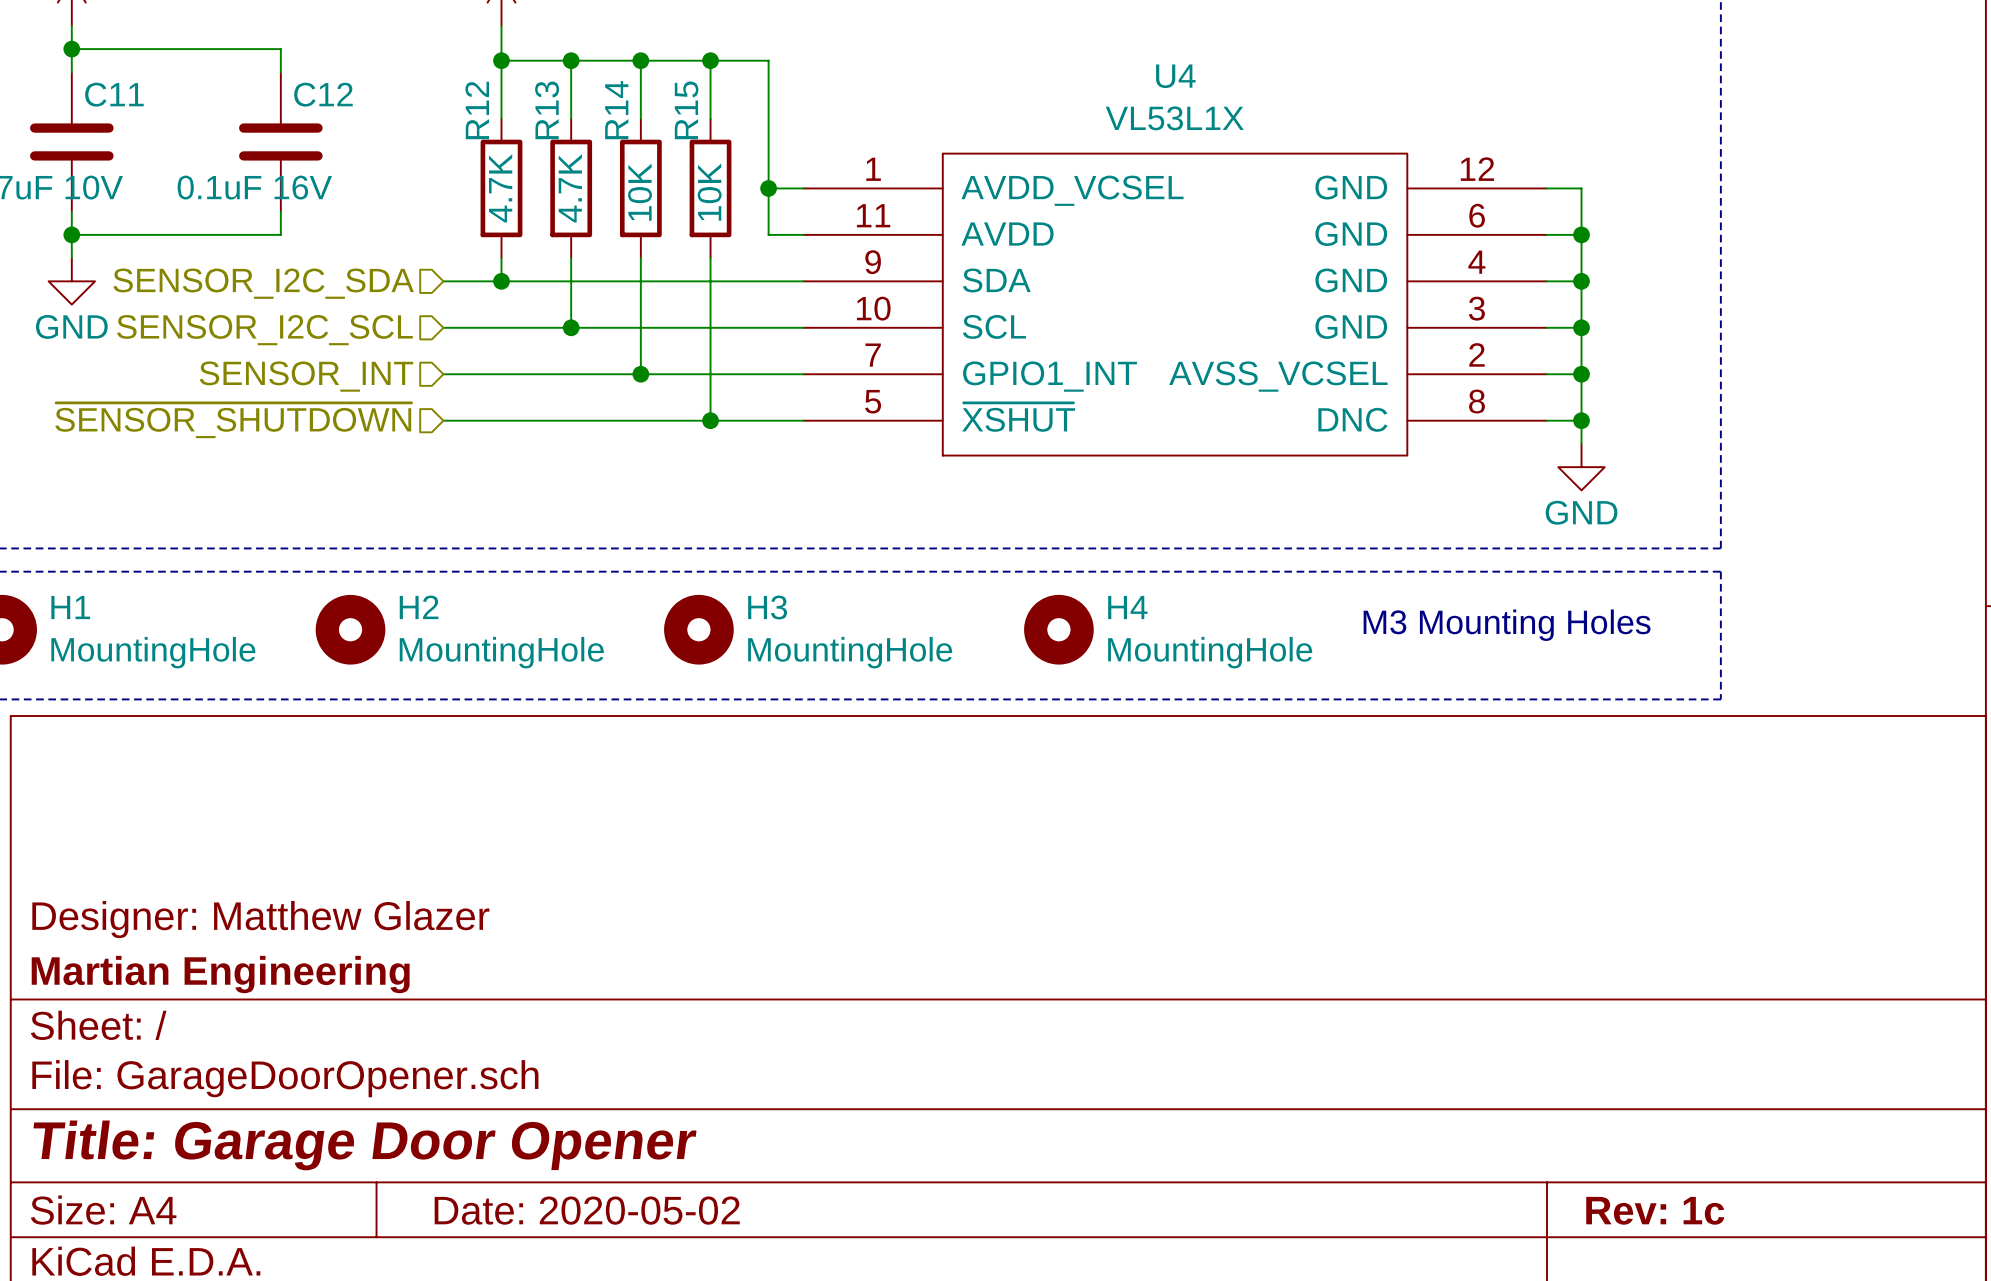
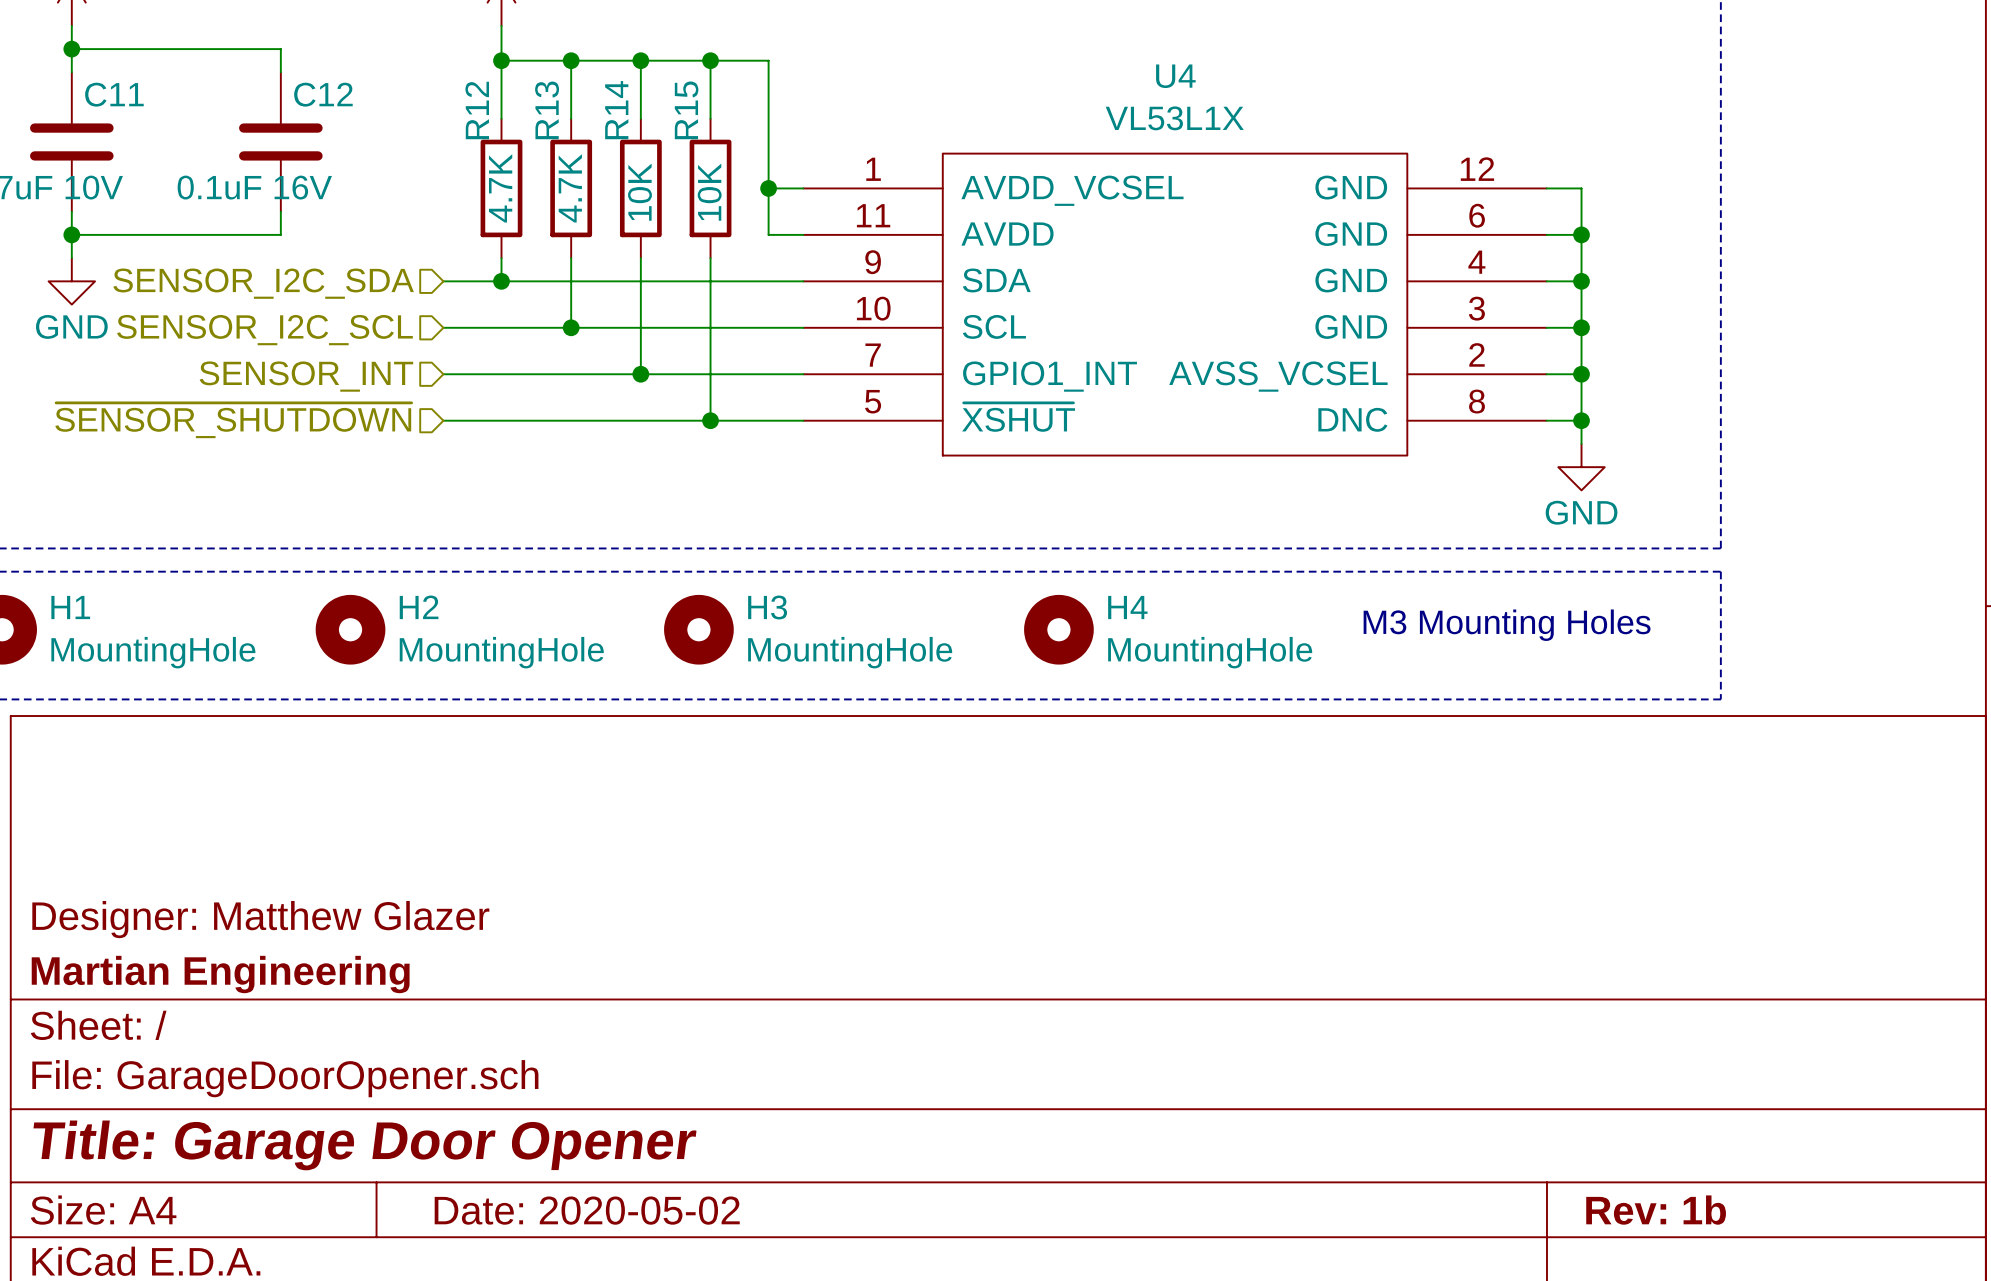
title block: Rev: 1c (1655, 1210) -> Rev: 1b (1656, 1210)

